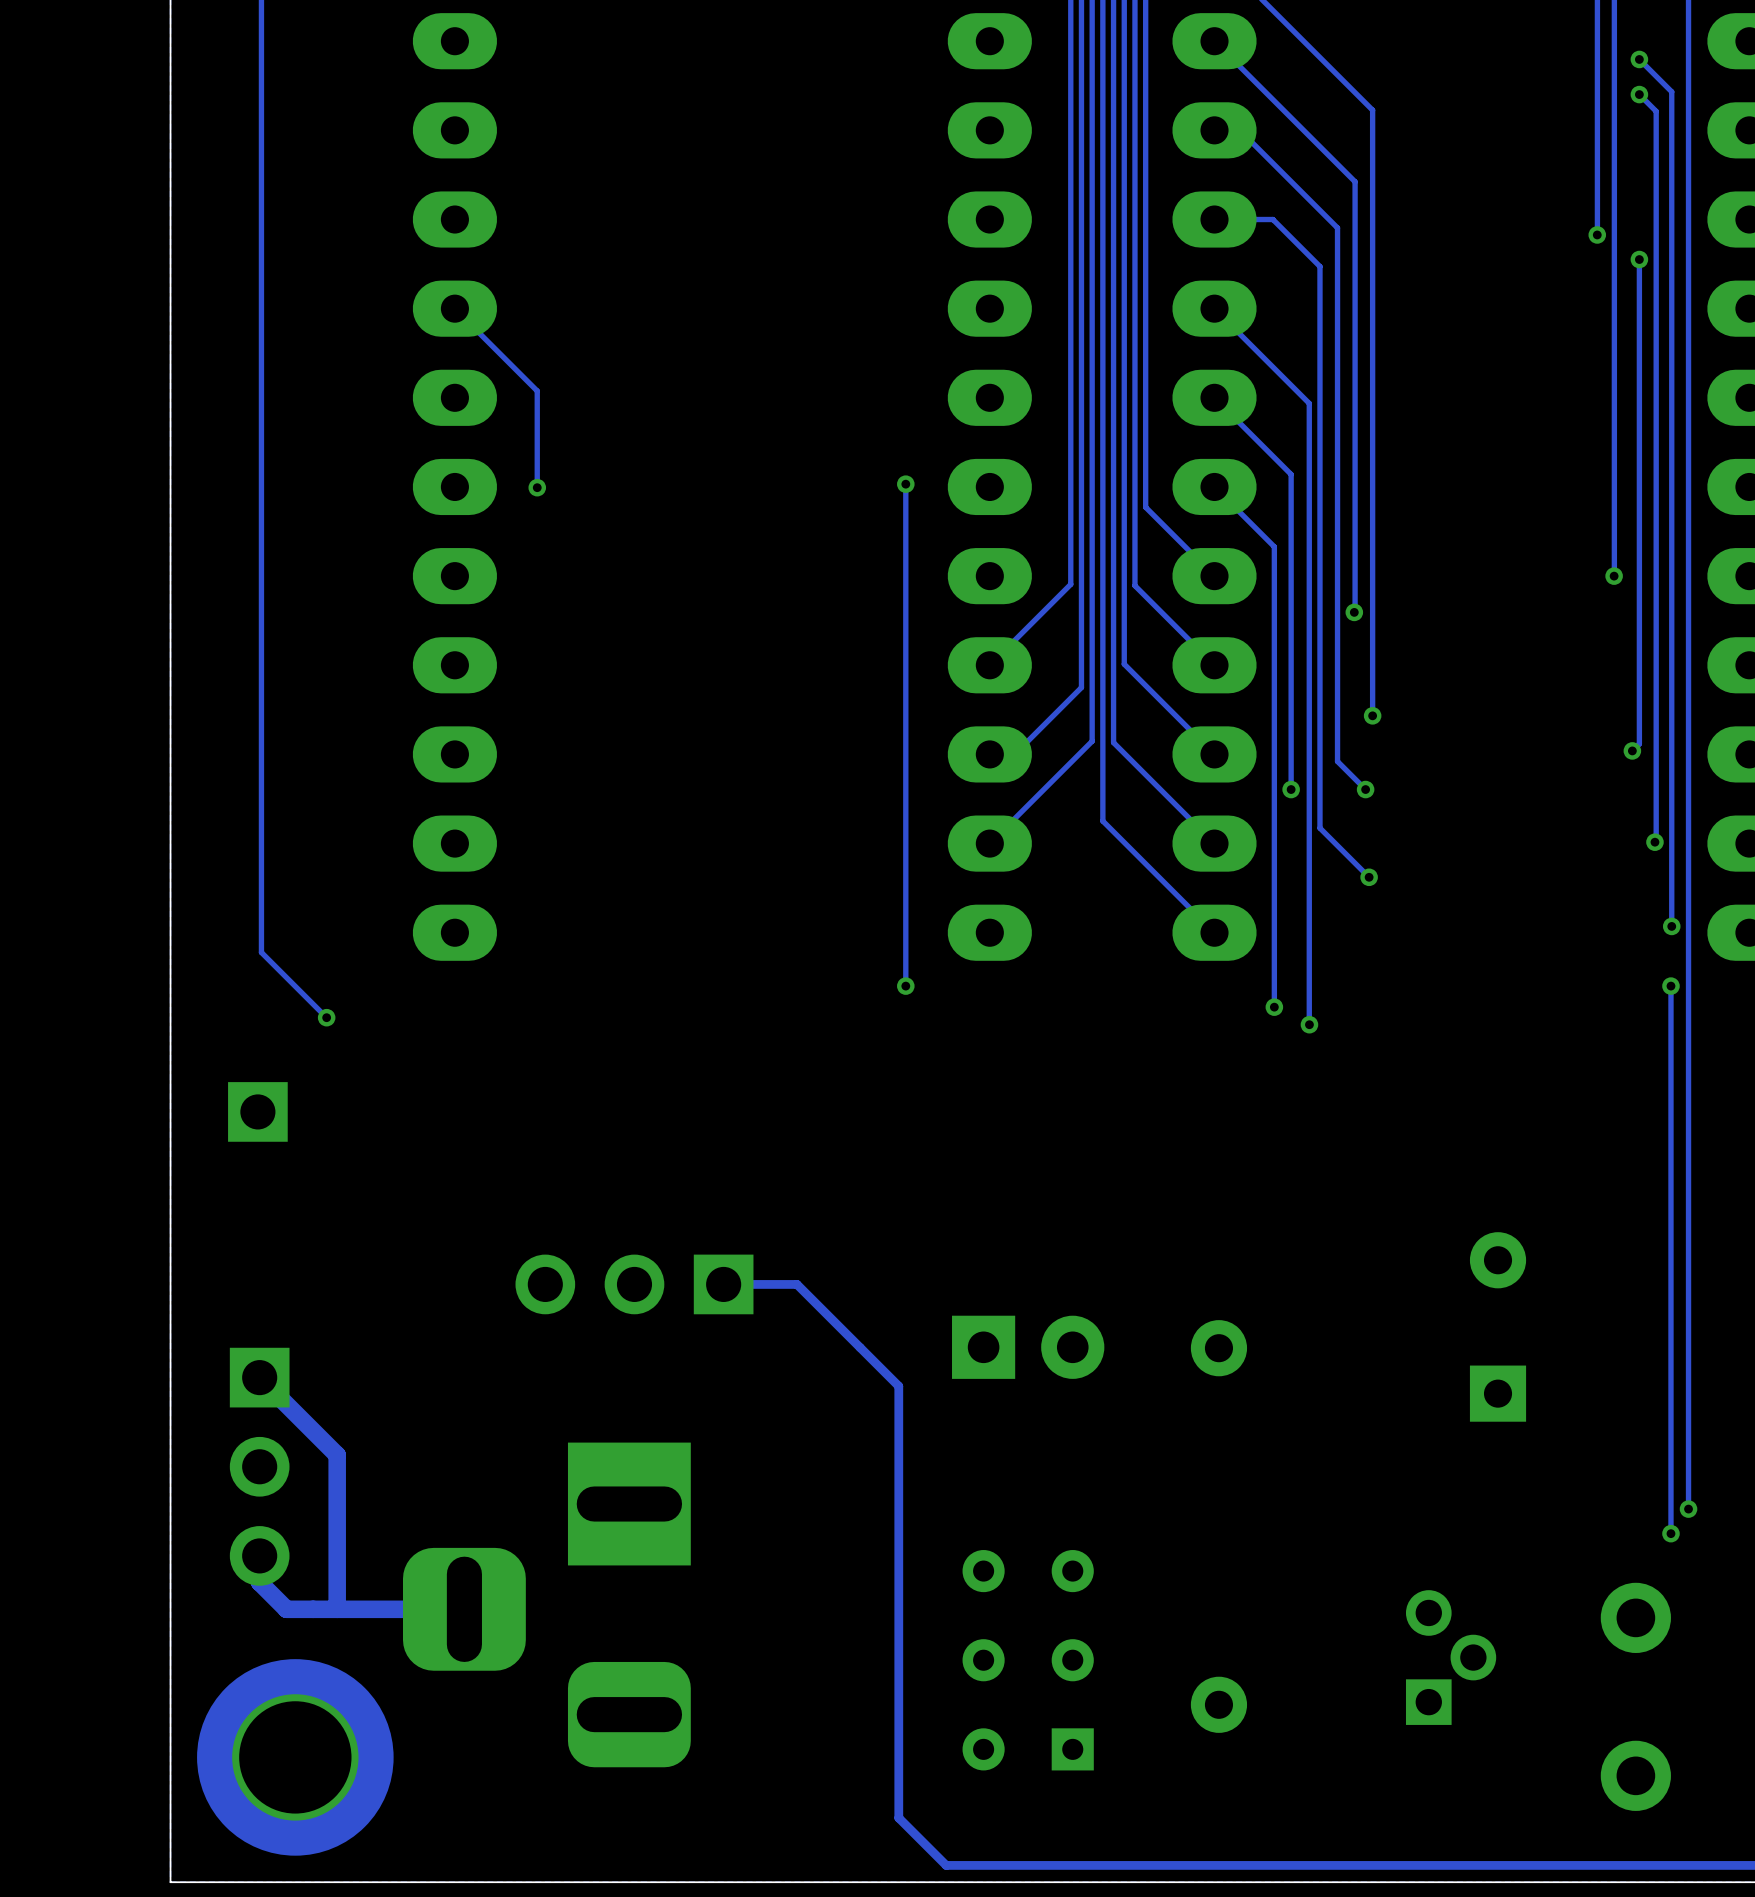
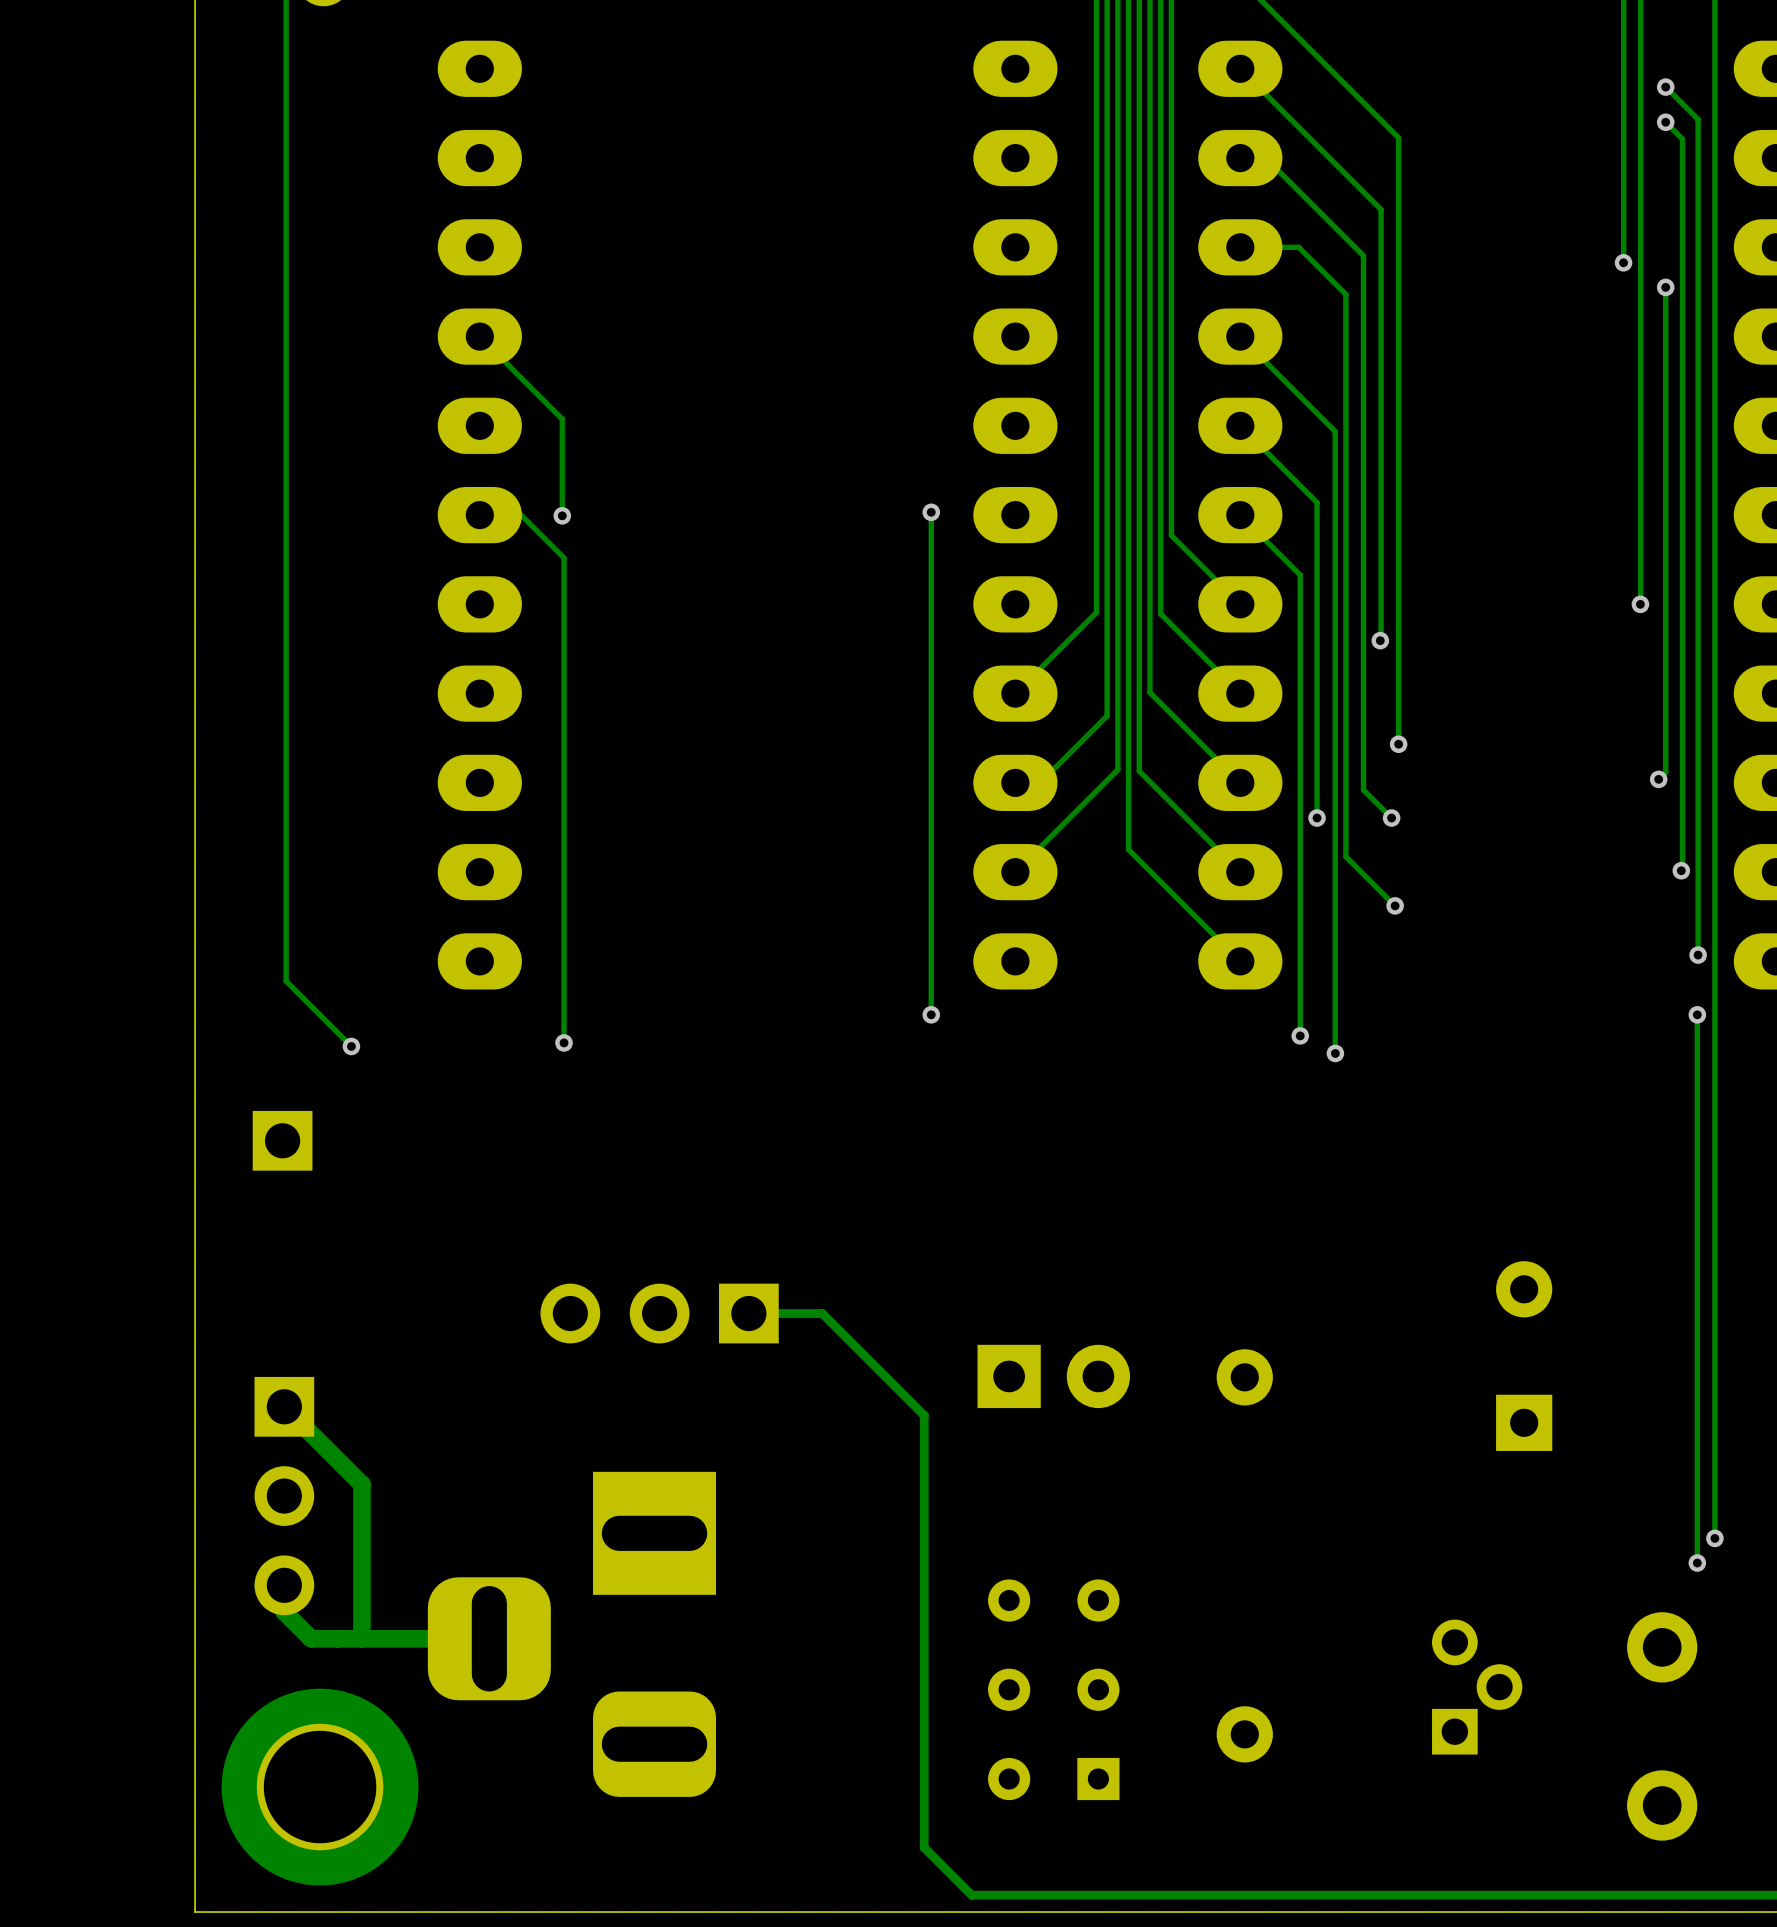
track: none -> (479, 515) (521, 515) (564, 557) (564, 1042)
via: none -> (564, 1042)

